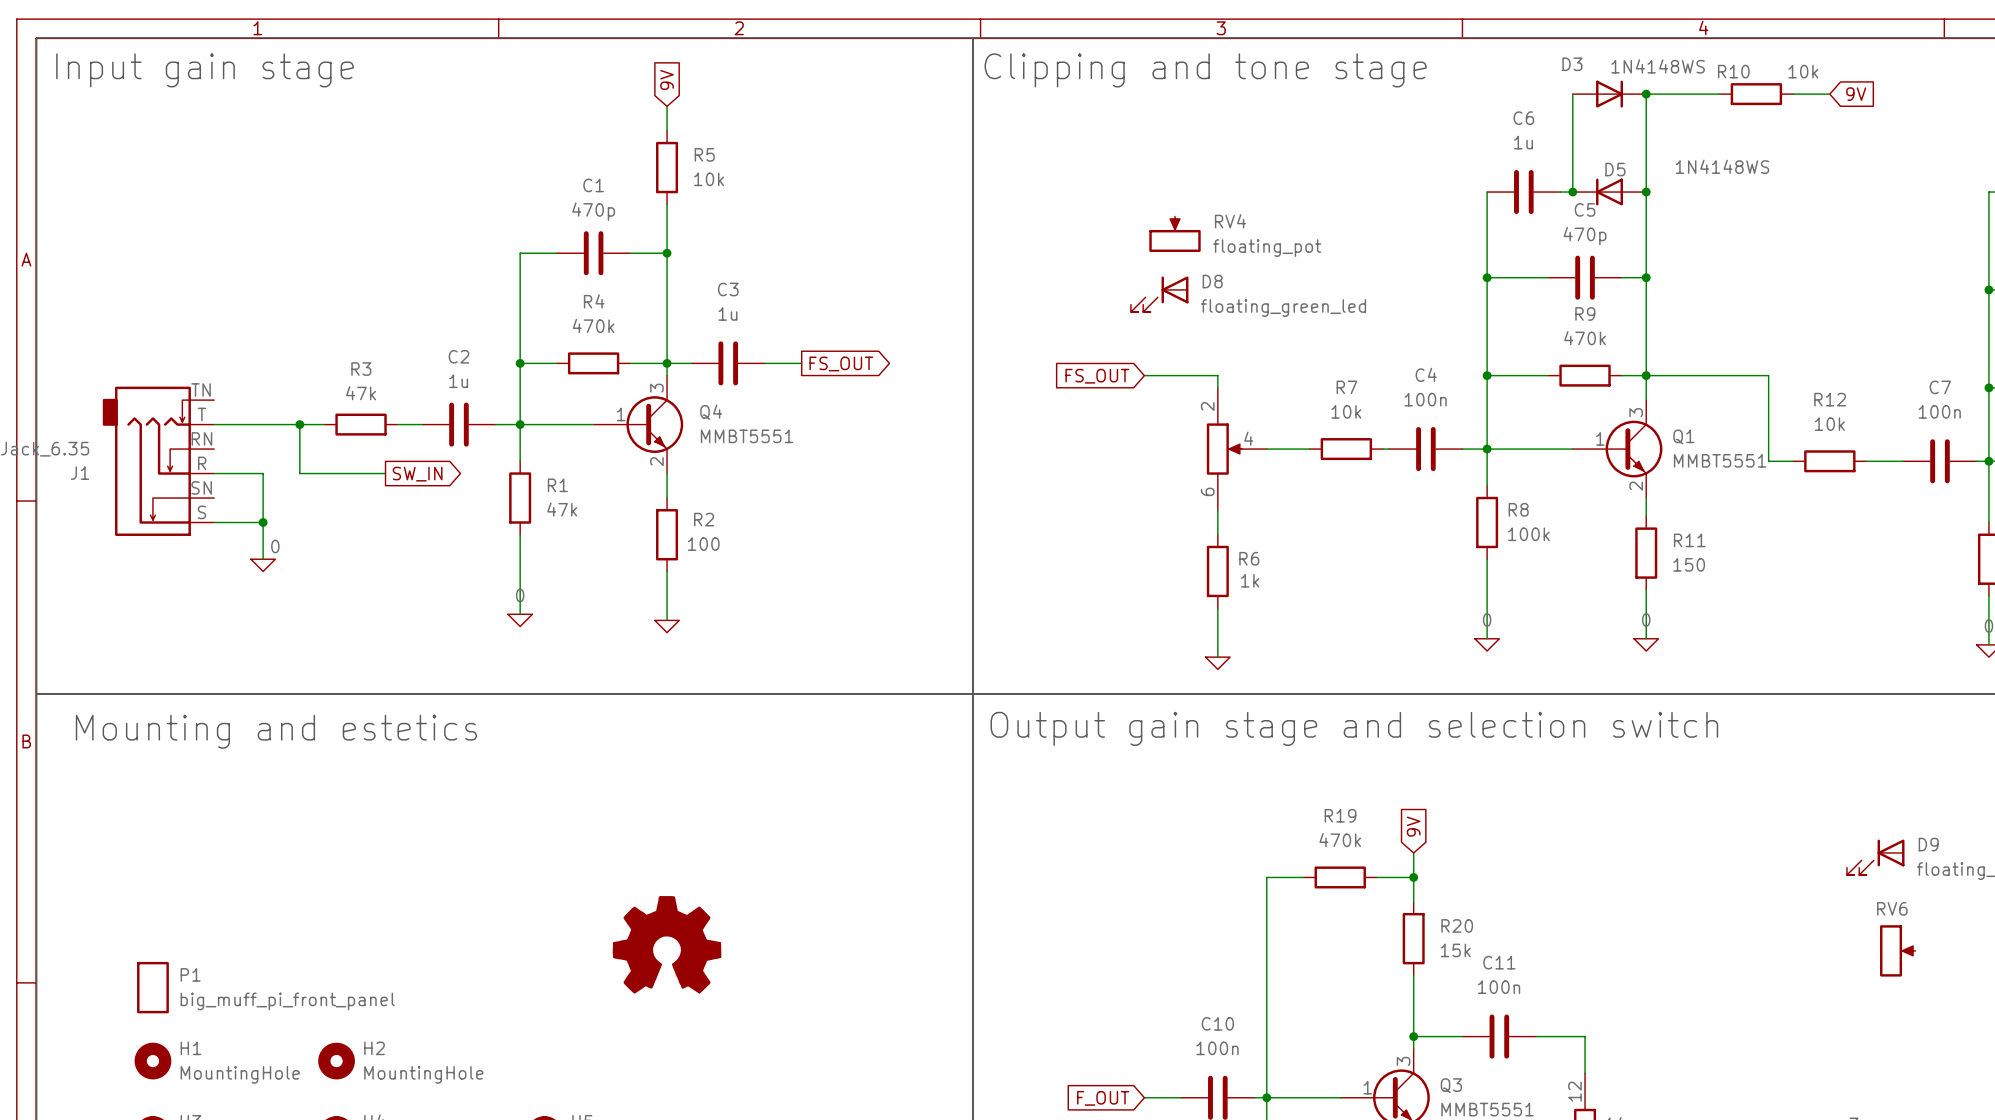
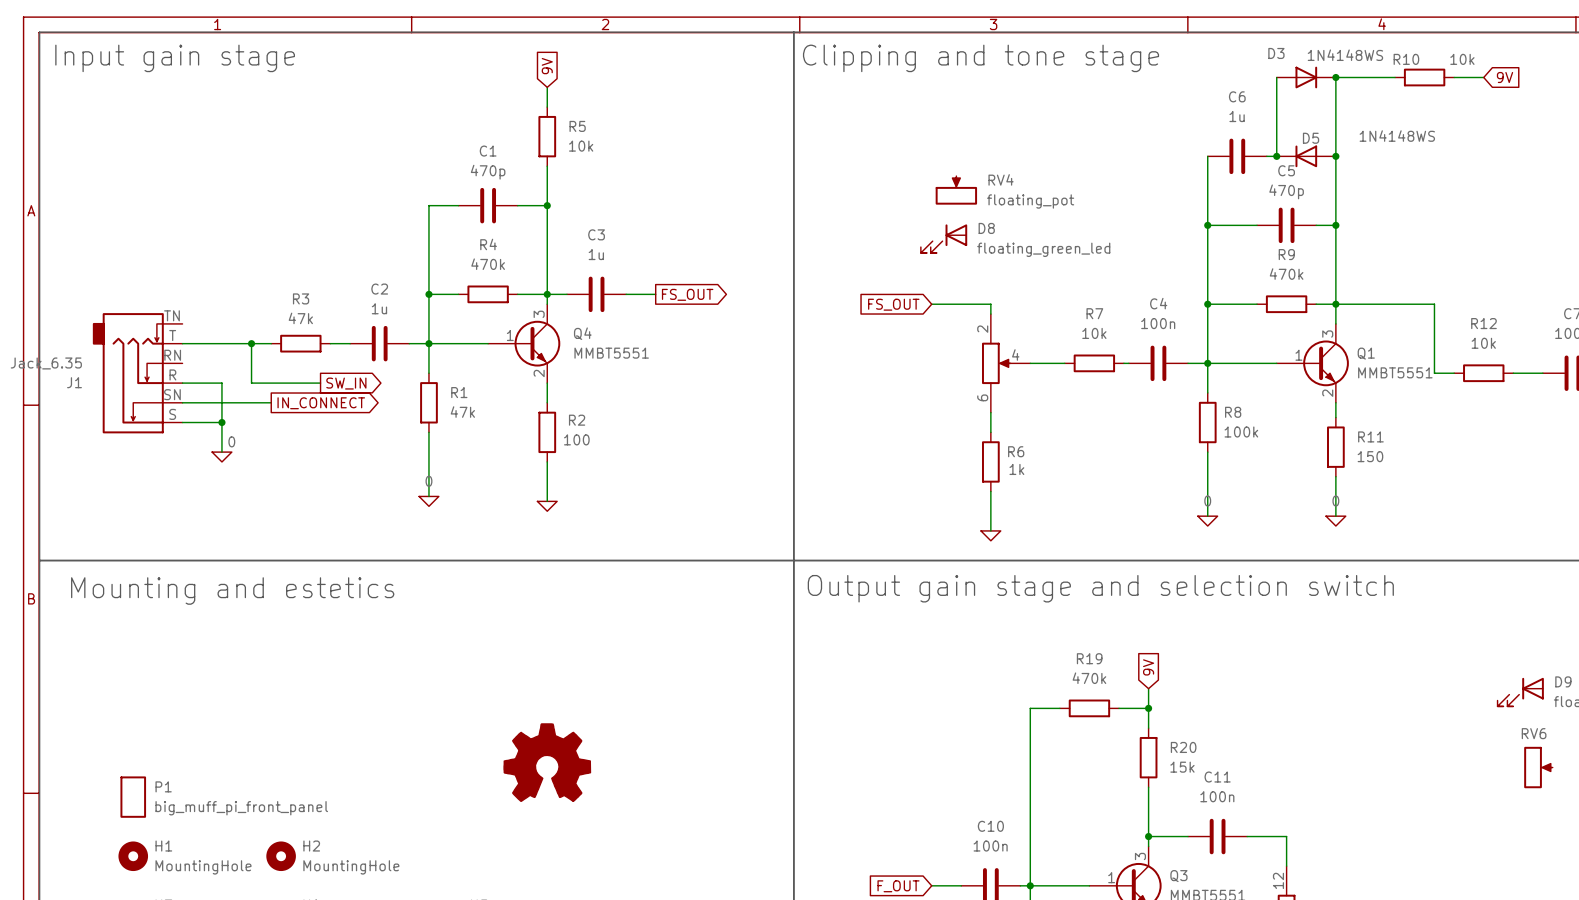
wire: none -> (182, 402) (271, 402)
global label: none -> IN_CONNECT (321, 403)

